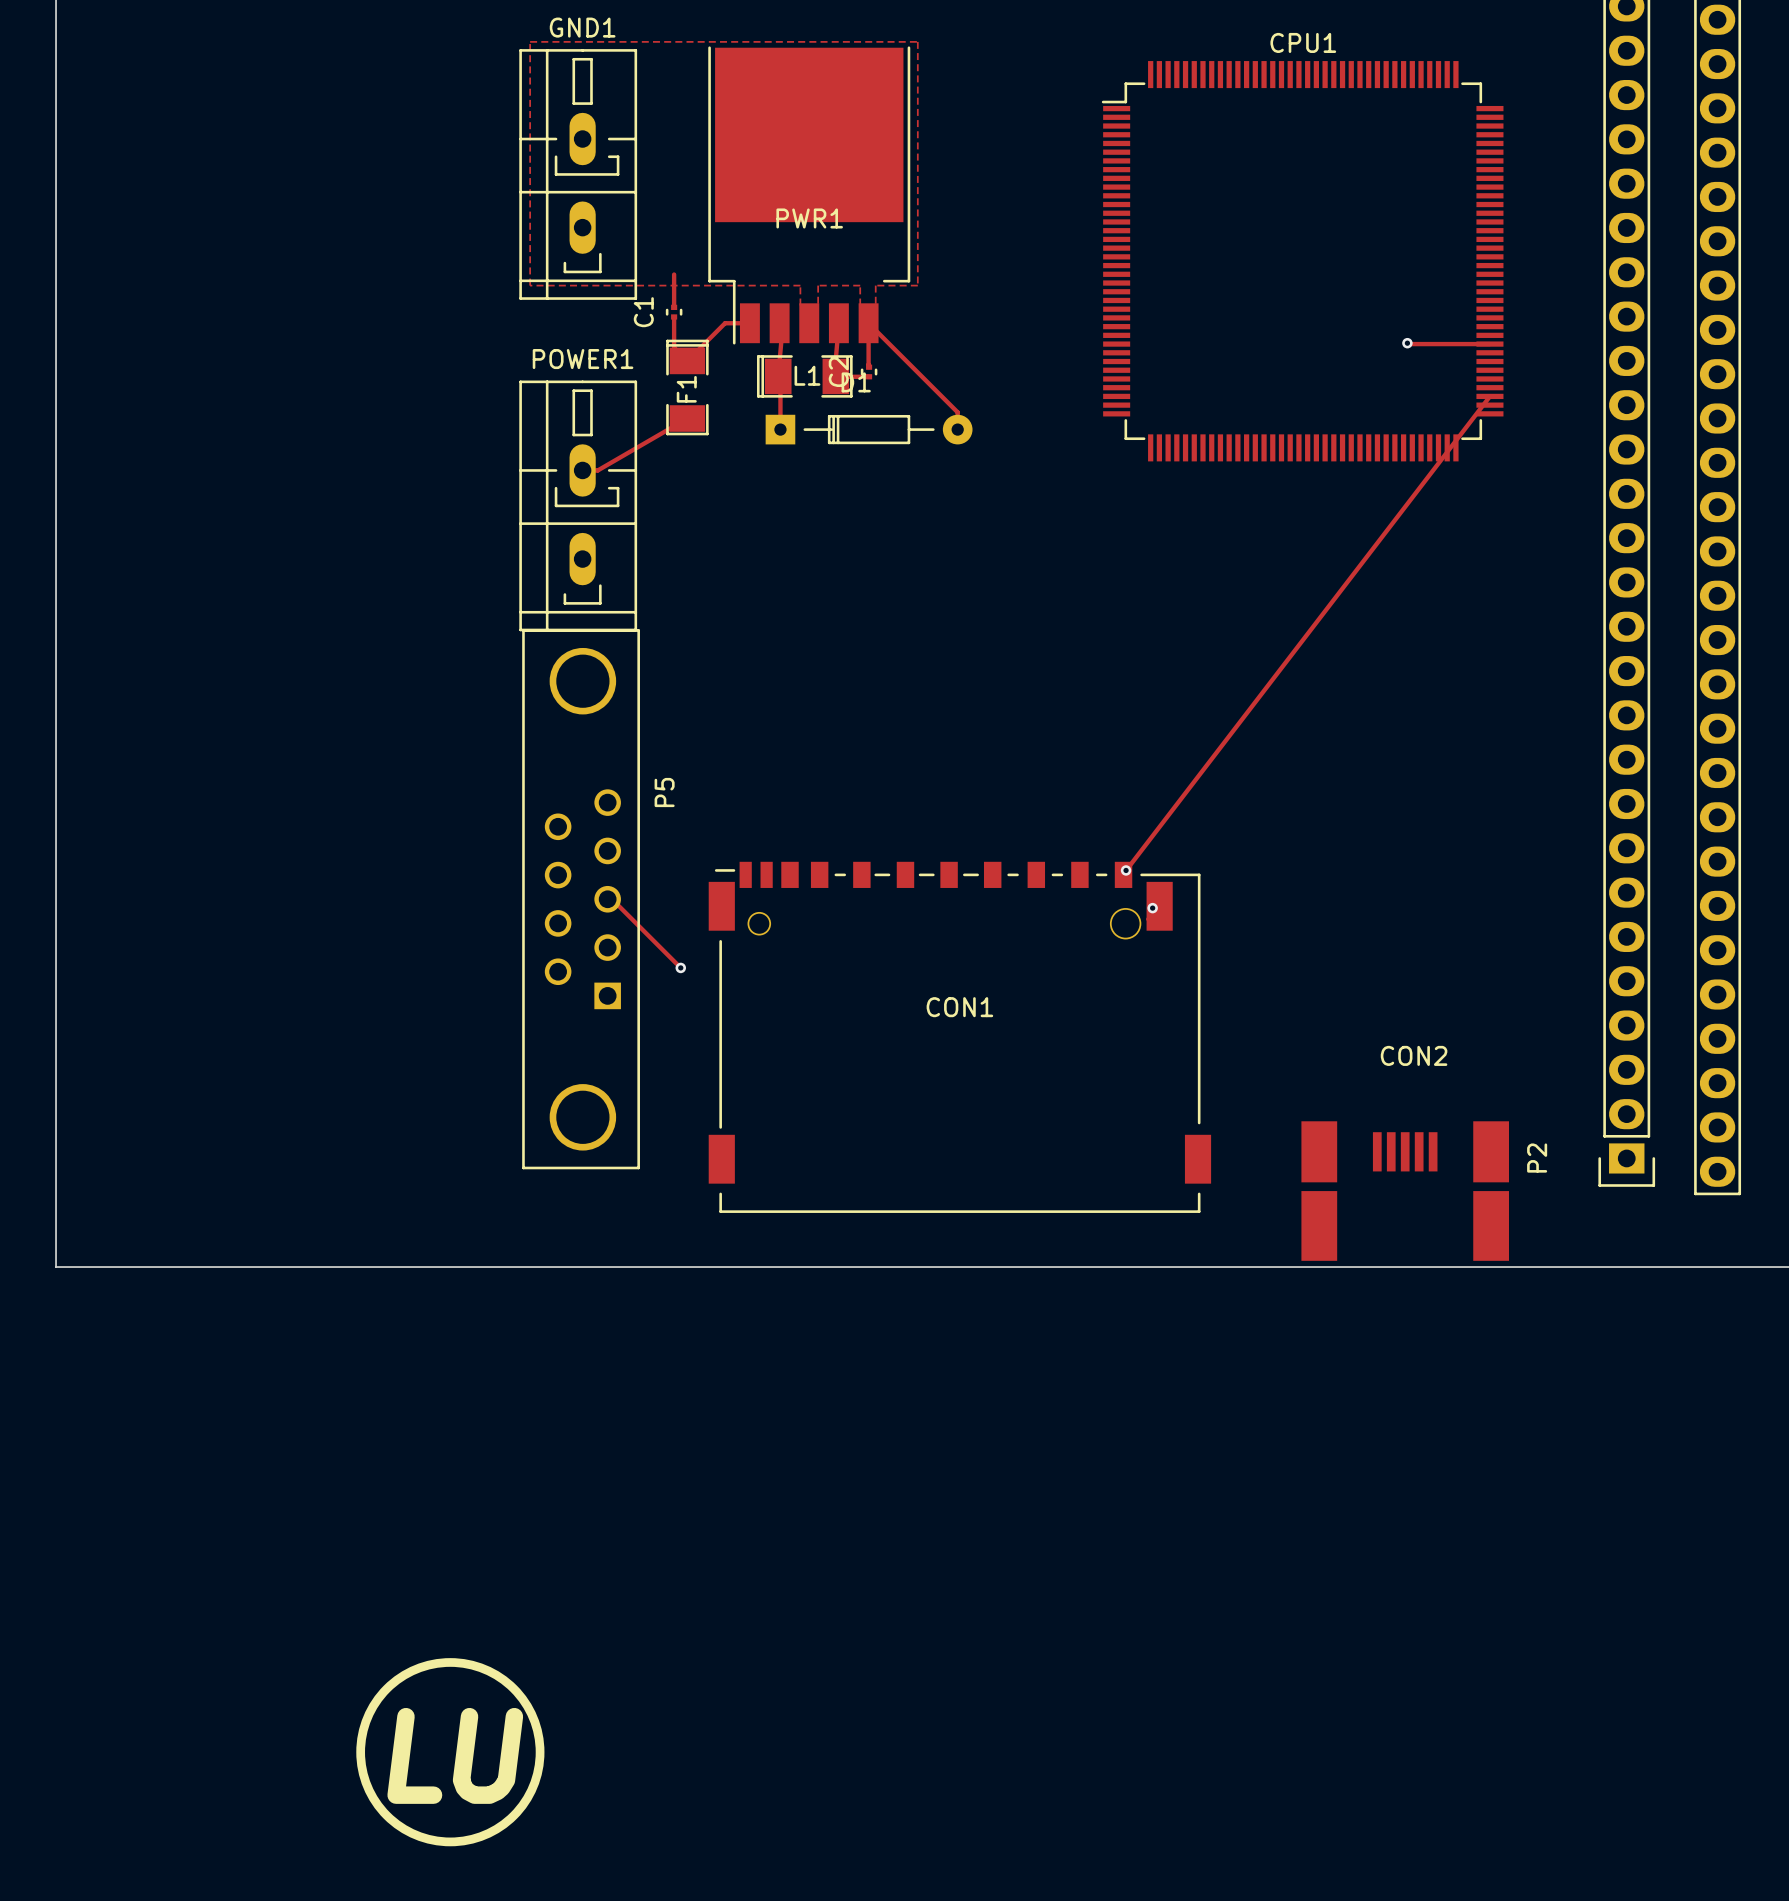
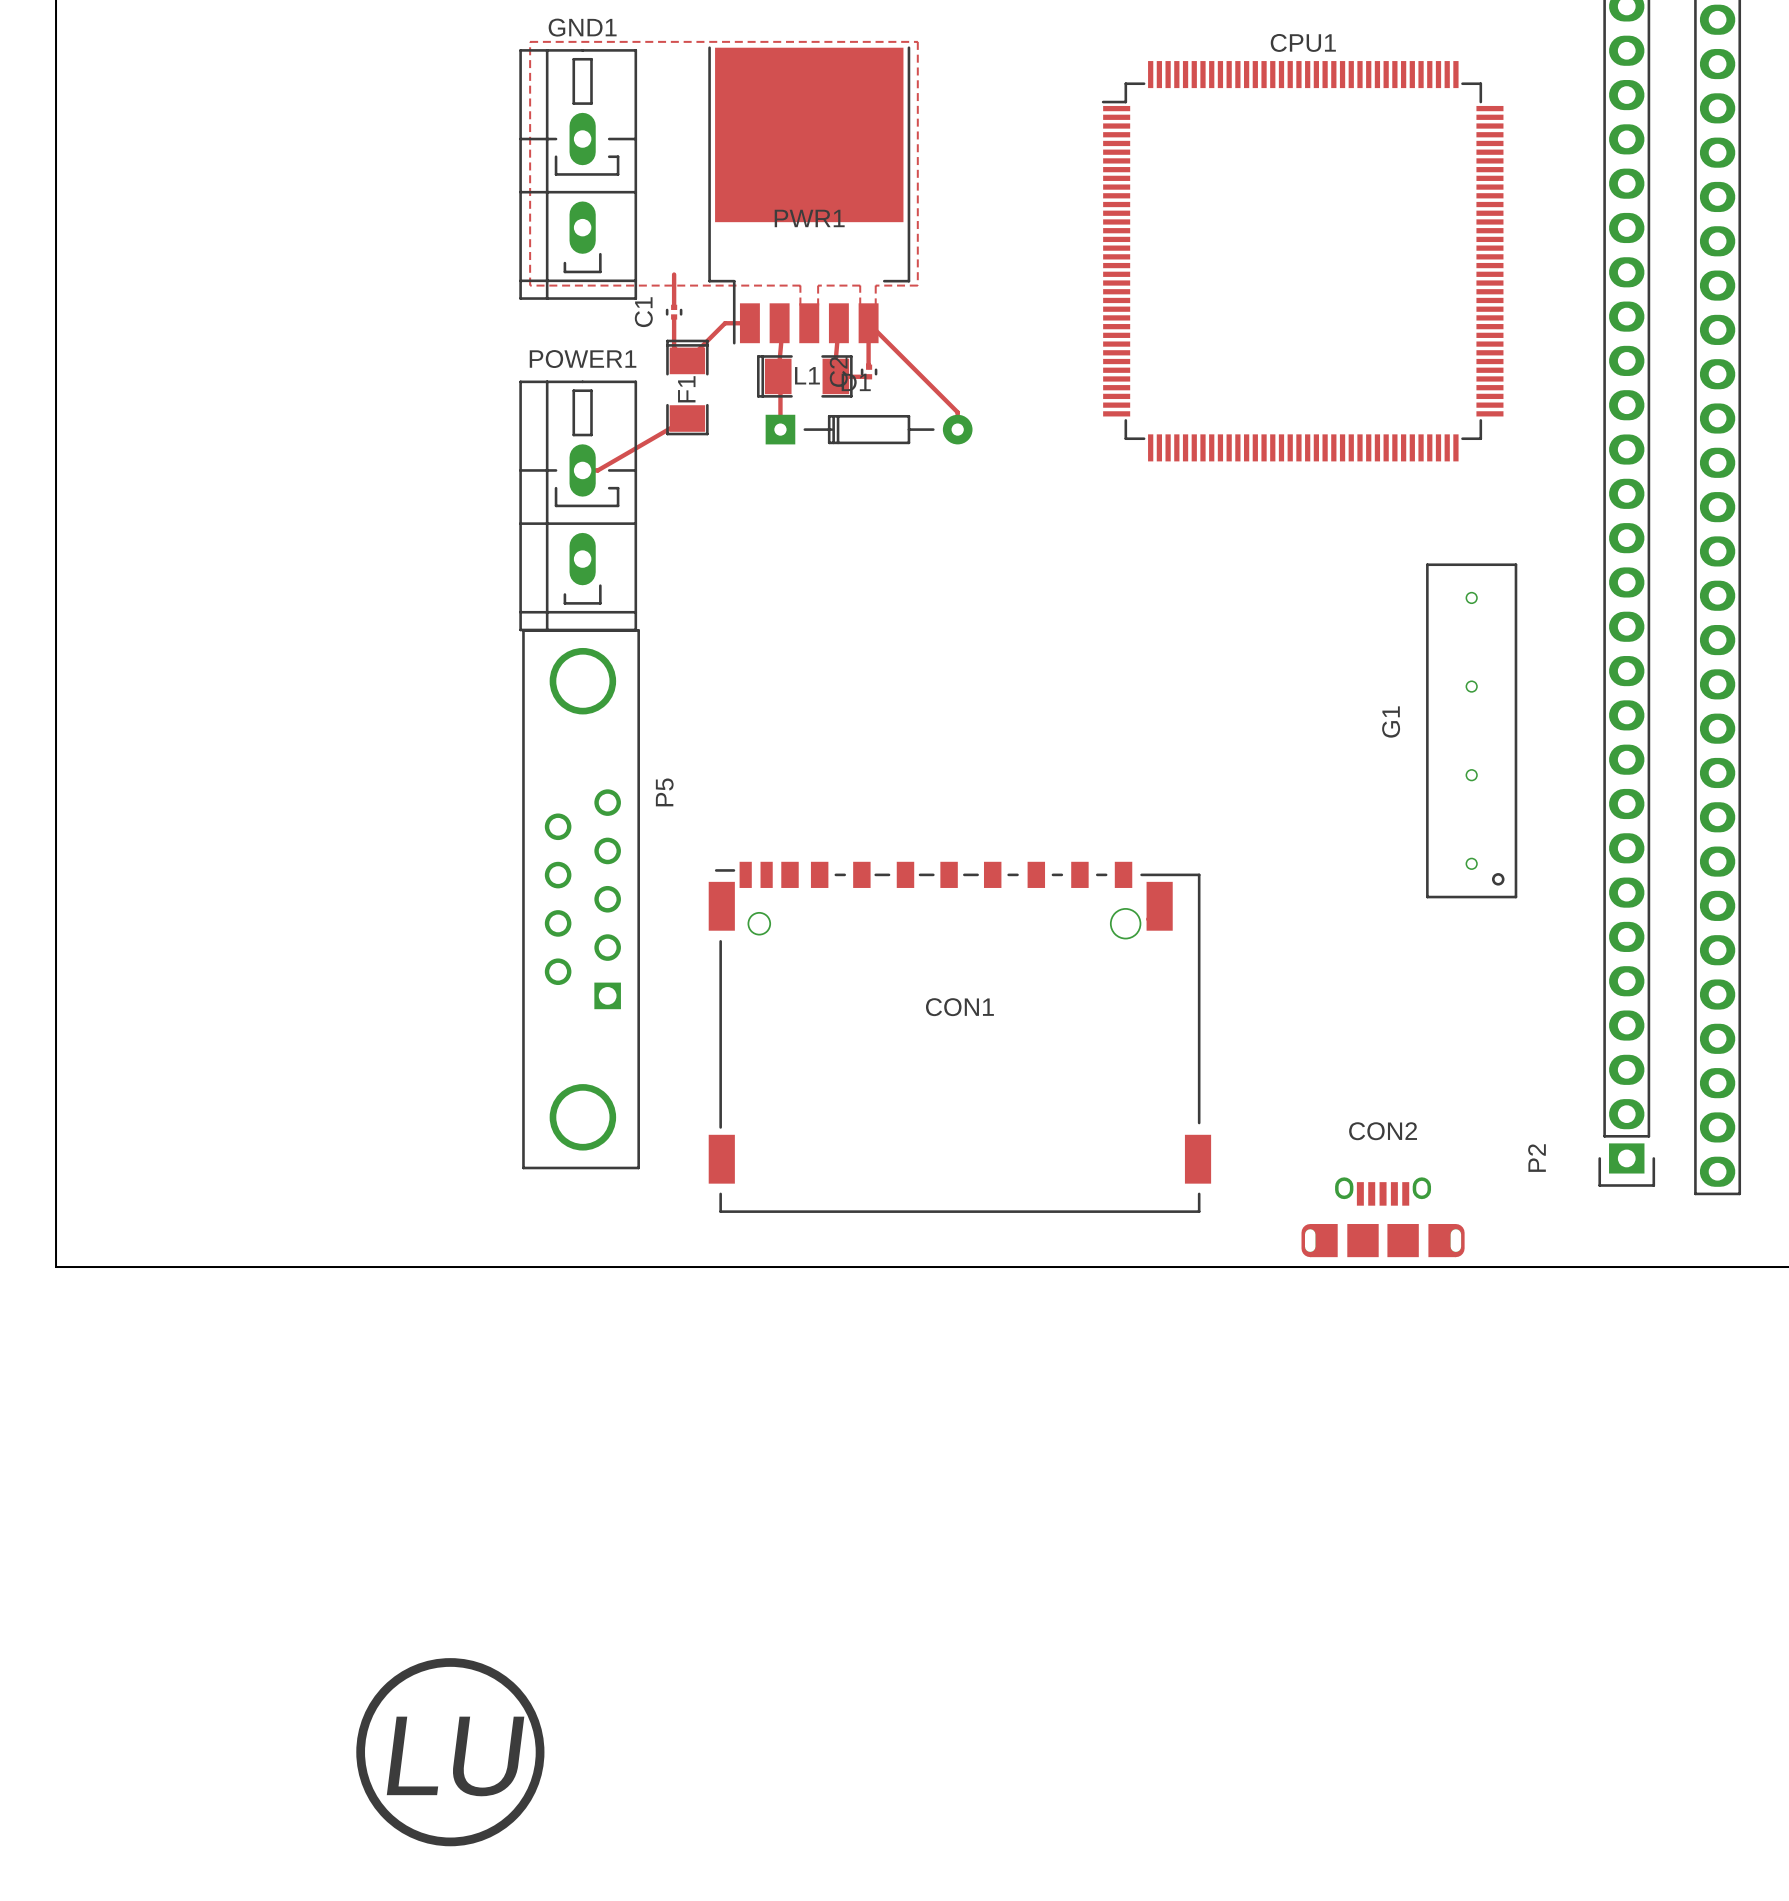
track: (1407, 343) (1489, 344) -> none
via: (1407, 343) -> none
track: (1489, 396) (1126, 870) -> none
G1: none -> (1471, 730)
via: (1126, 870) -> none
track: (612, 899) (680, 967) -> none
via: (1152, 908) -> none
via: (680, 967) -> none
CON2 name position: CON2 (1414, 1055) -> CON2 (1383, 1131)
CON2 footprint: [1301, 1121, 1510, 1261] -> [1301, 1177, 1465, 1258]

